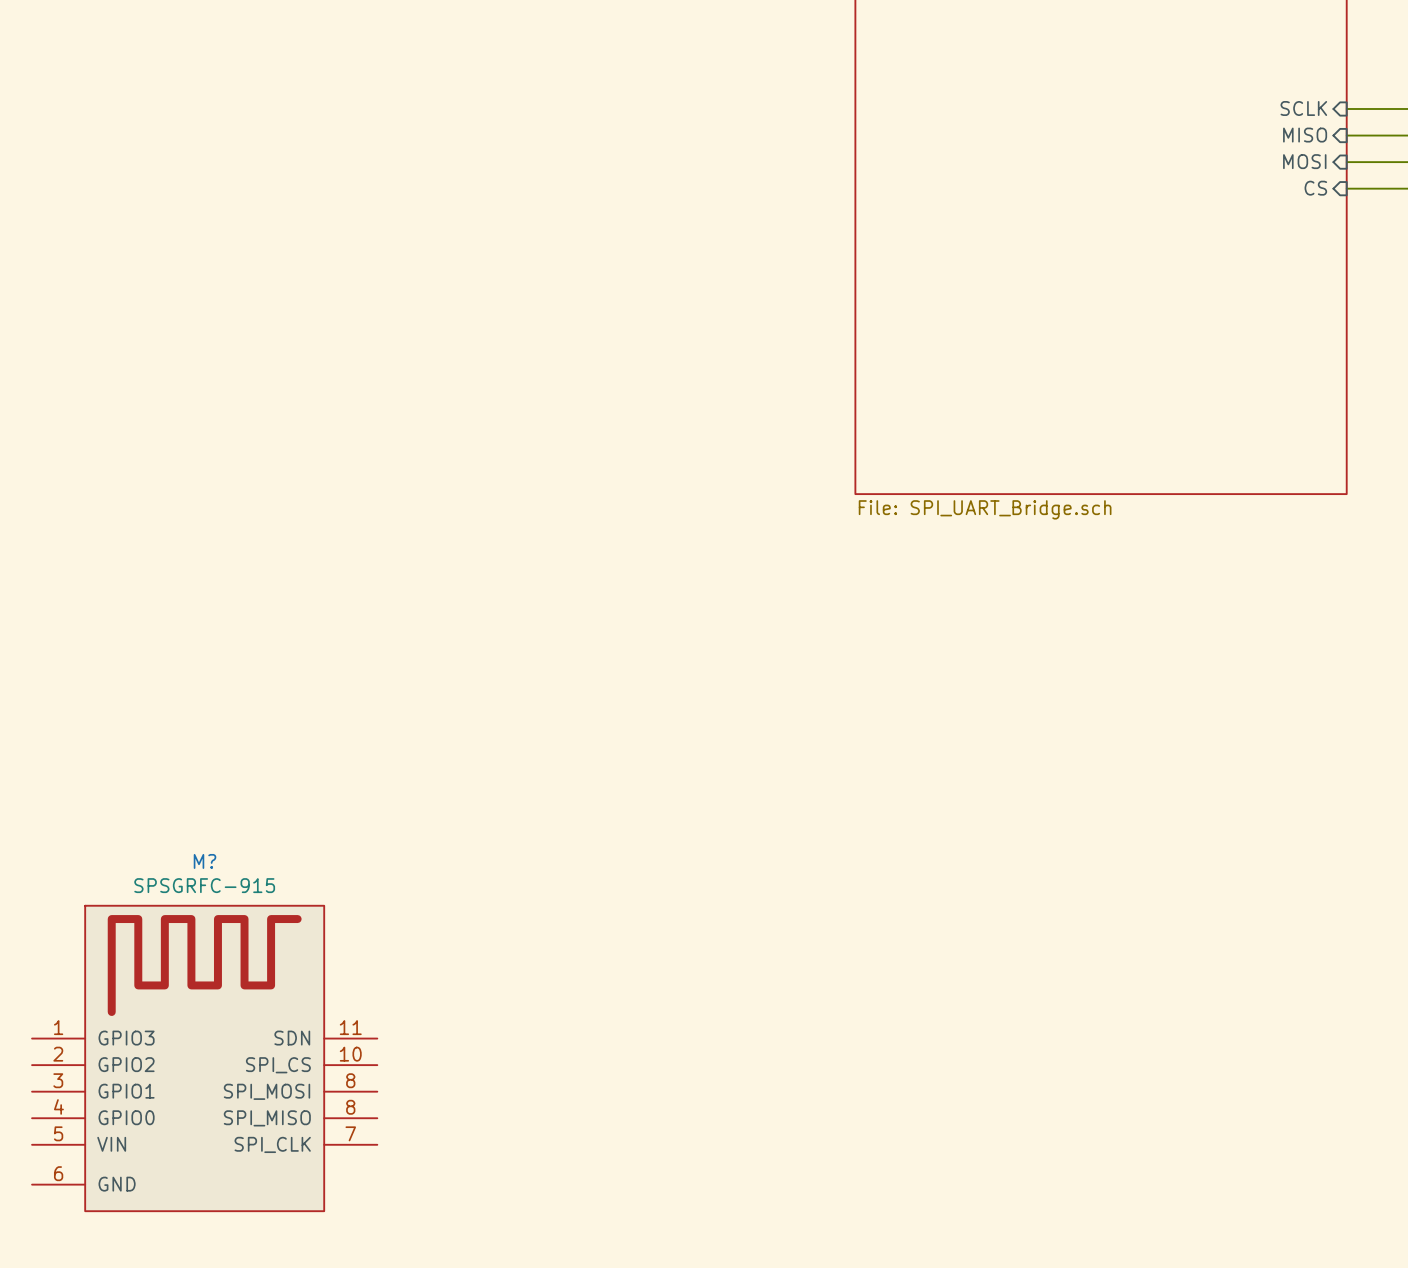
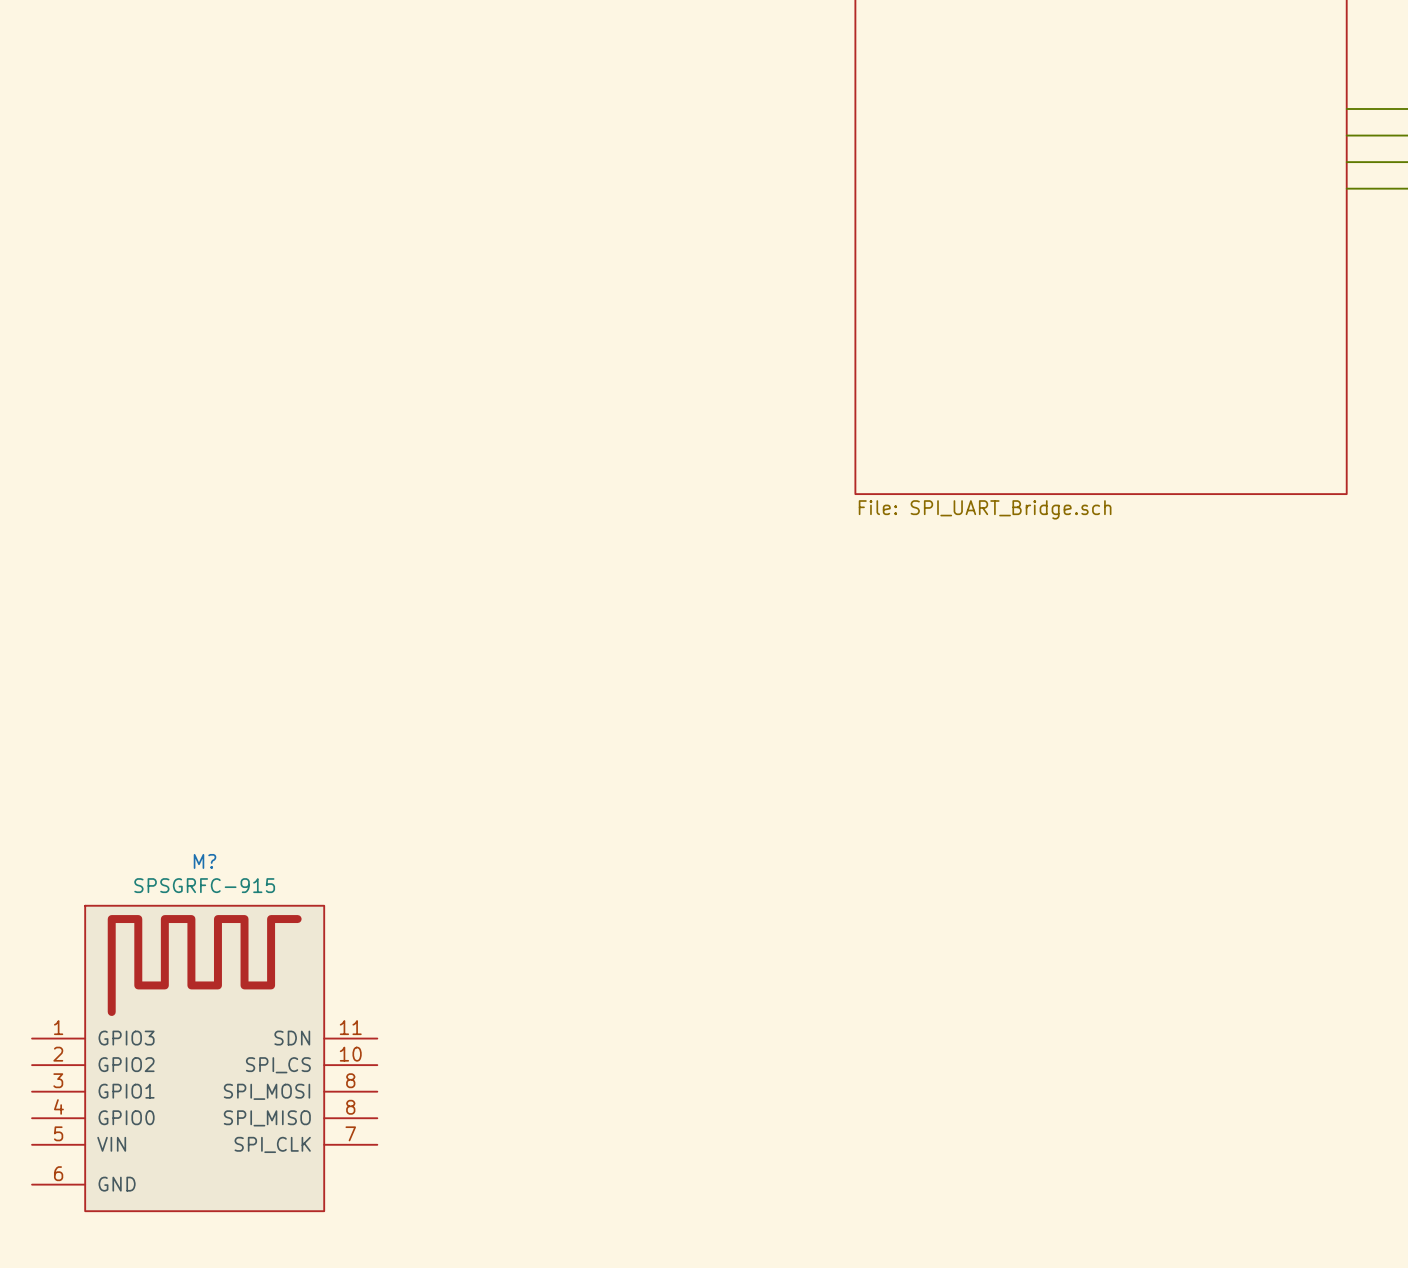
sheet pin: SCLK (1303, 108) -> none
sheet pin: MISO (1305, 135) -> none
sheet pin: MOSI (1304, 161) -> none
sheet pin: CS (1315, 188) -> none

